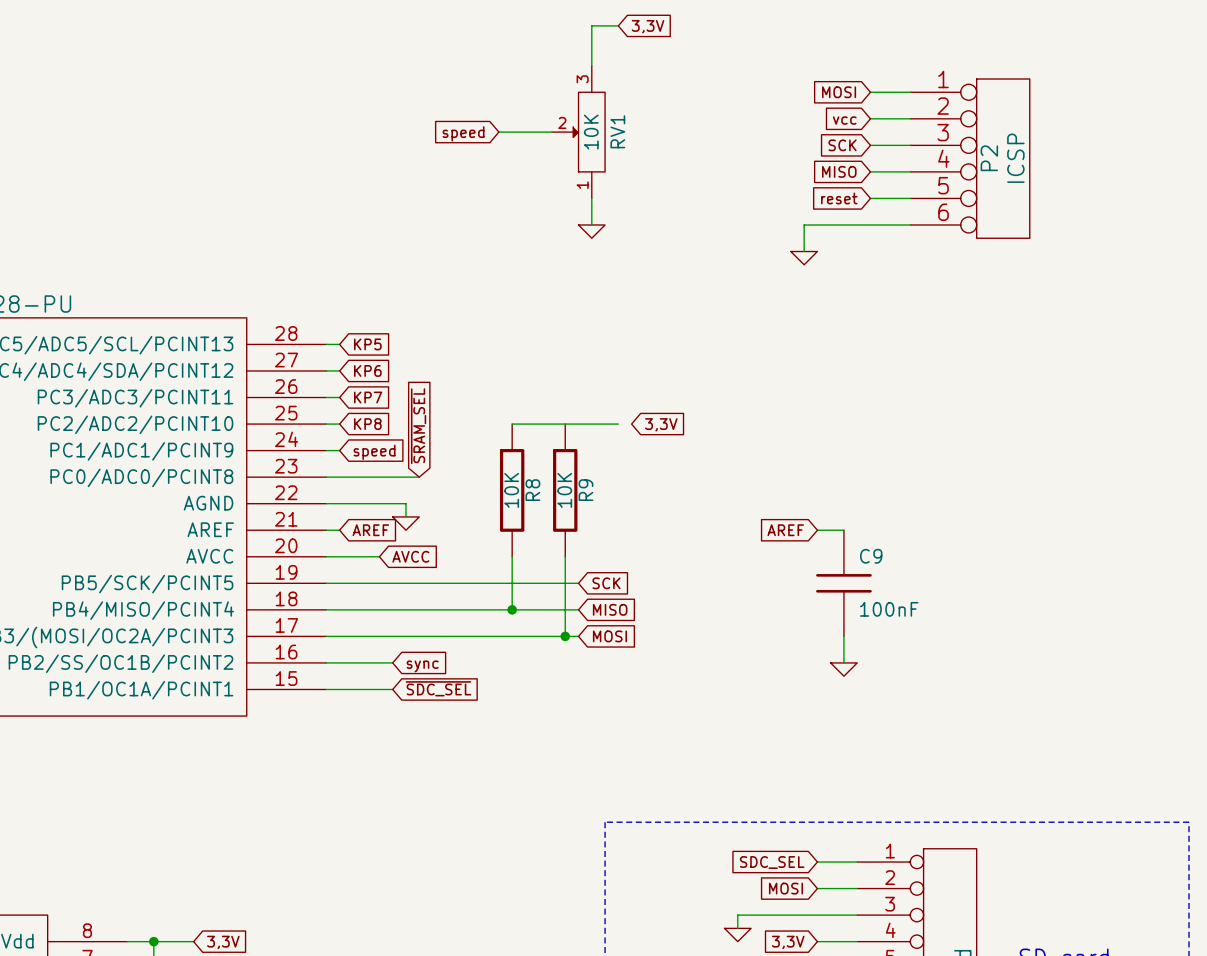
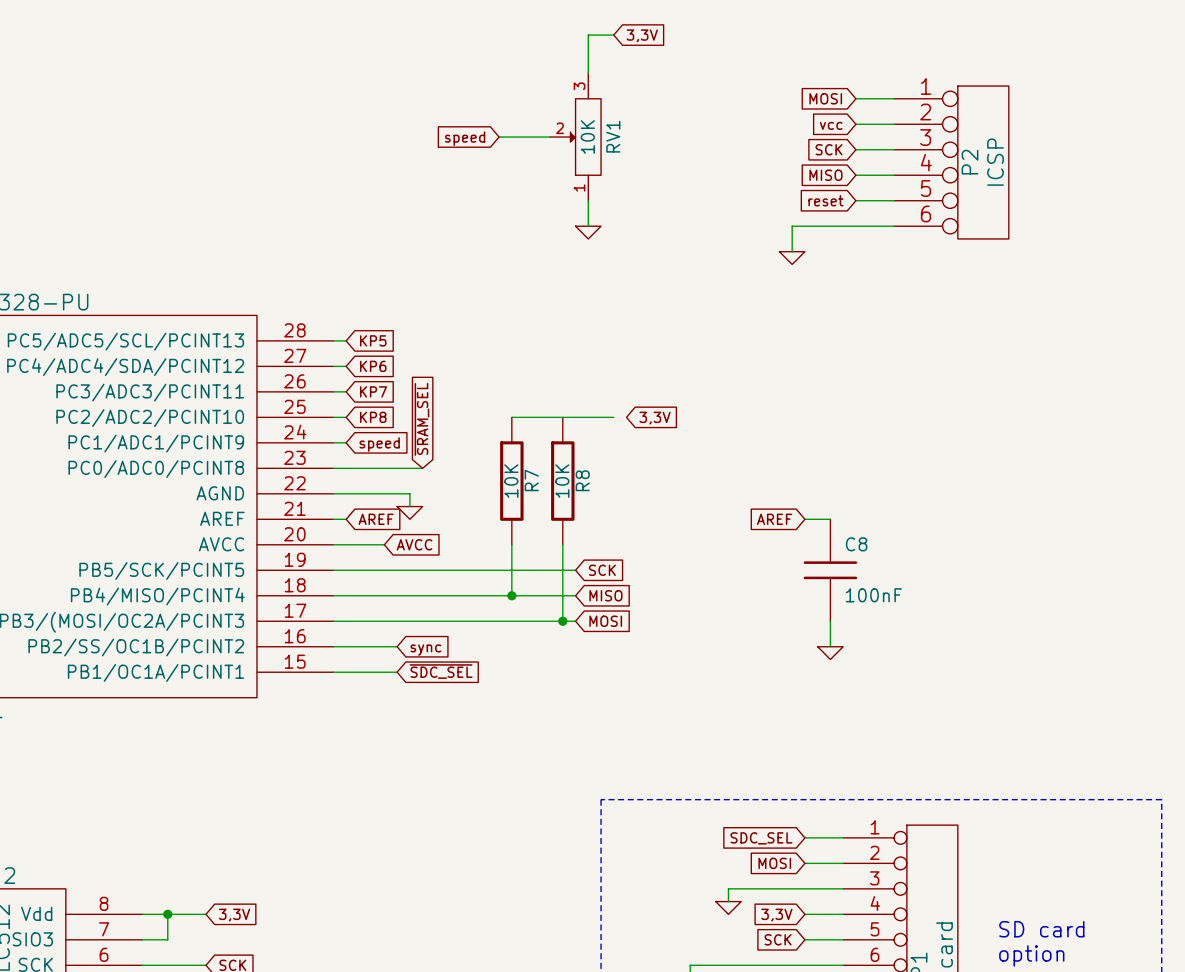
R8 name: R8 (532, 490) -> R7 (531, 480)
R9 name: R9 (585, 490) -> R8 (582, 480)
C9 name: C9 (871, 556) -> C8 (856, 544)

